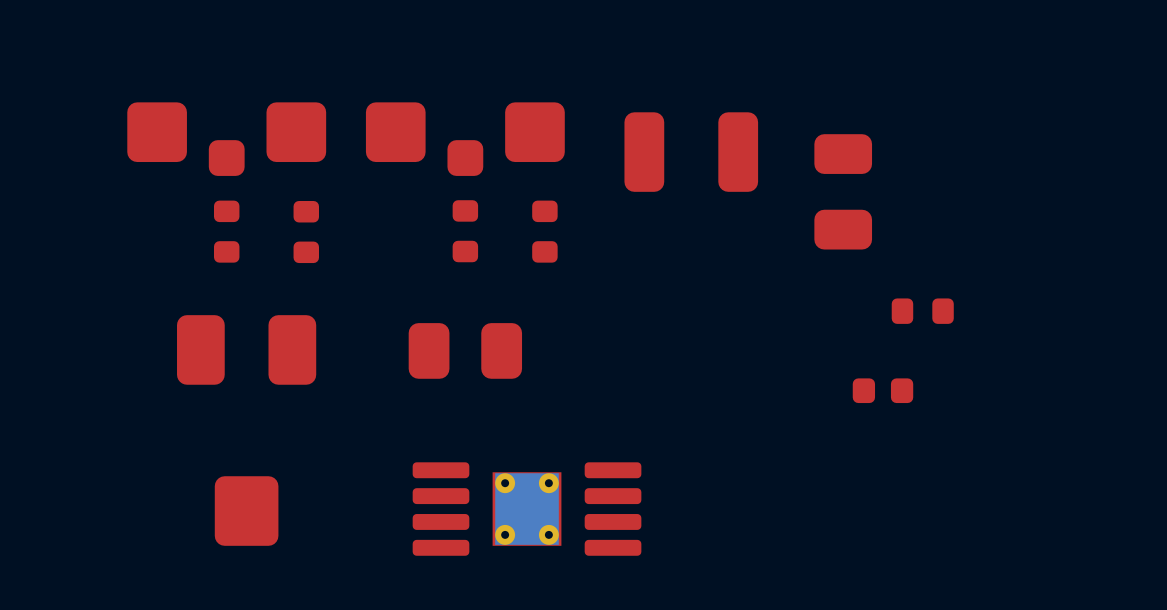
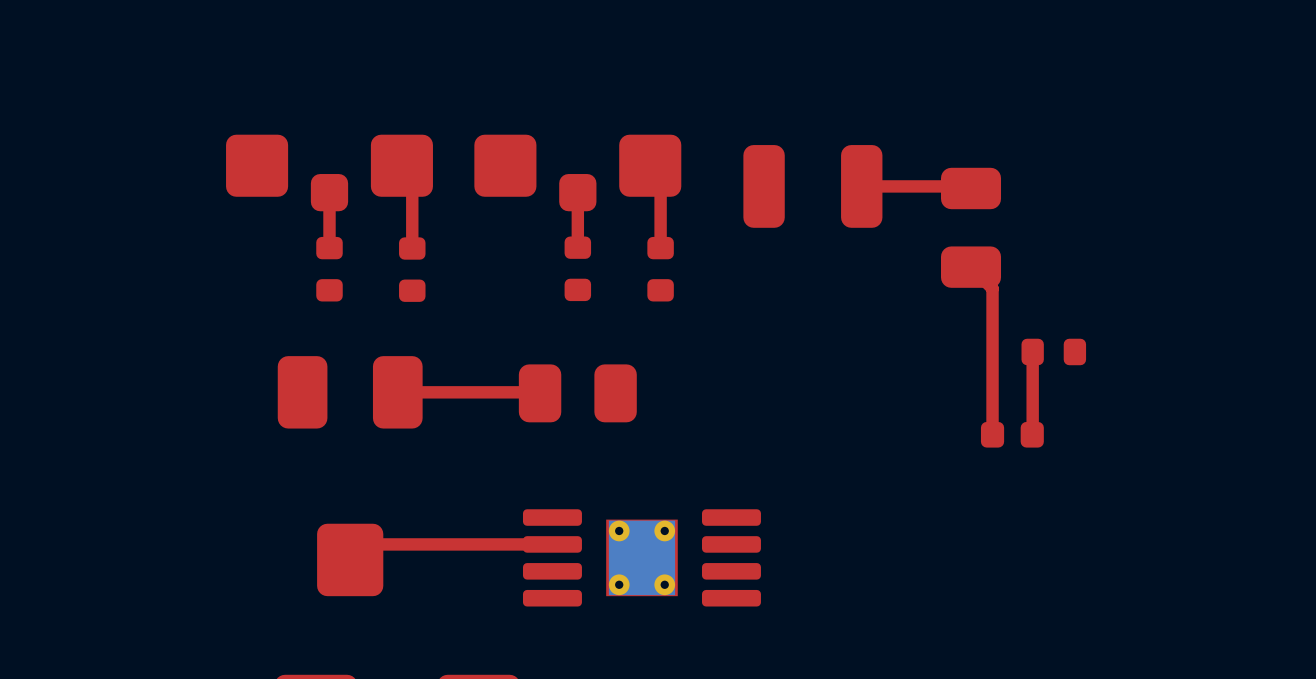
top track: none -> (401, 165) (412, 176) (412, 248)
top track: none -> (650, 165) (660, 176) (660, 248)
top track: none -> (861, 186) (968, 186) (971, 188)
top track: none -> (329, 192) (329, 248)
top track: none -> (577, 192) (577, 247)
top track: none -> (971, 267) (992, 288) (992, 434)
top track: none -> (1032, 351) (1032, 434)
top track: none -> (397, 392) (540, 393)
top track: none -> (552, 544) (365, 544) (350, 559)

